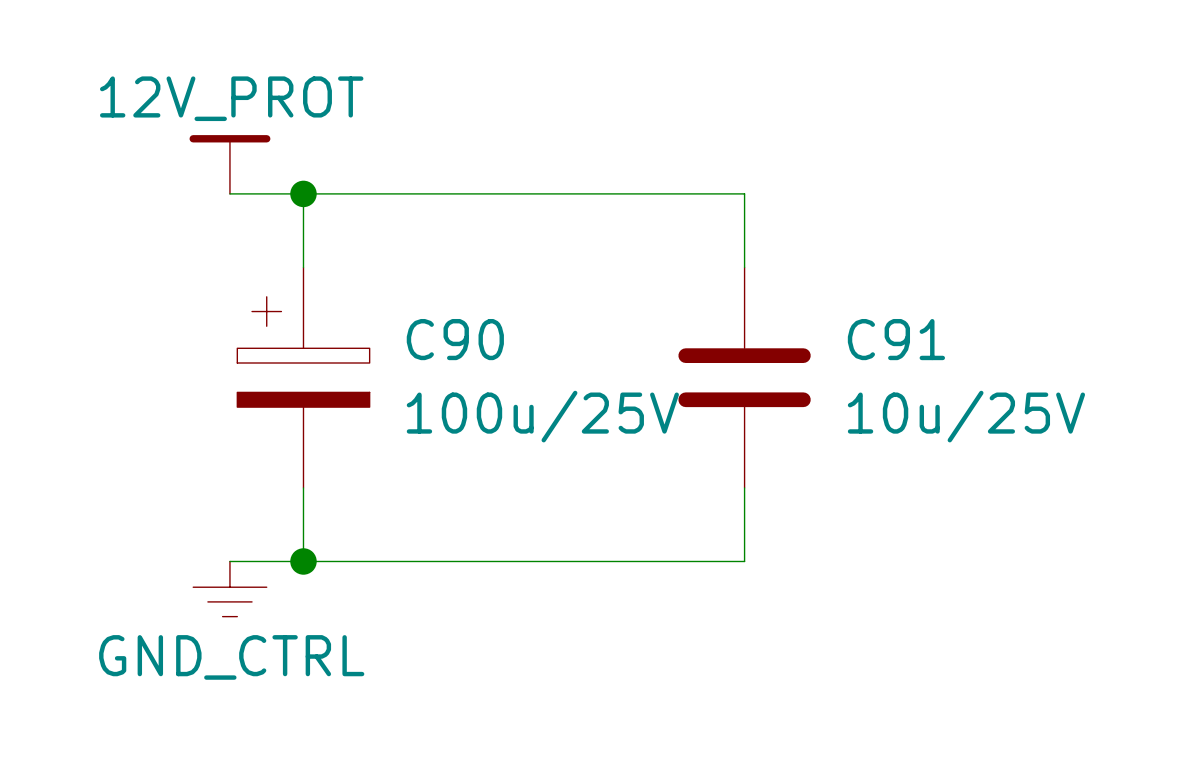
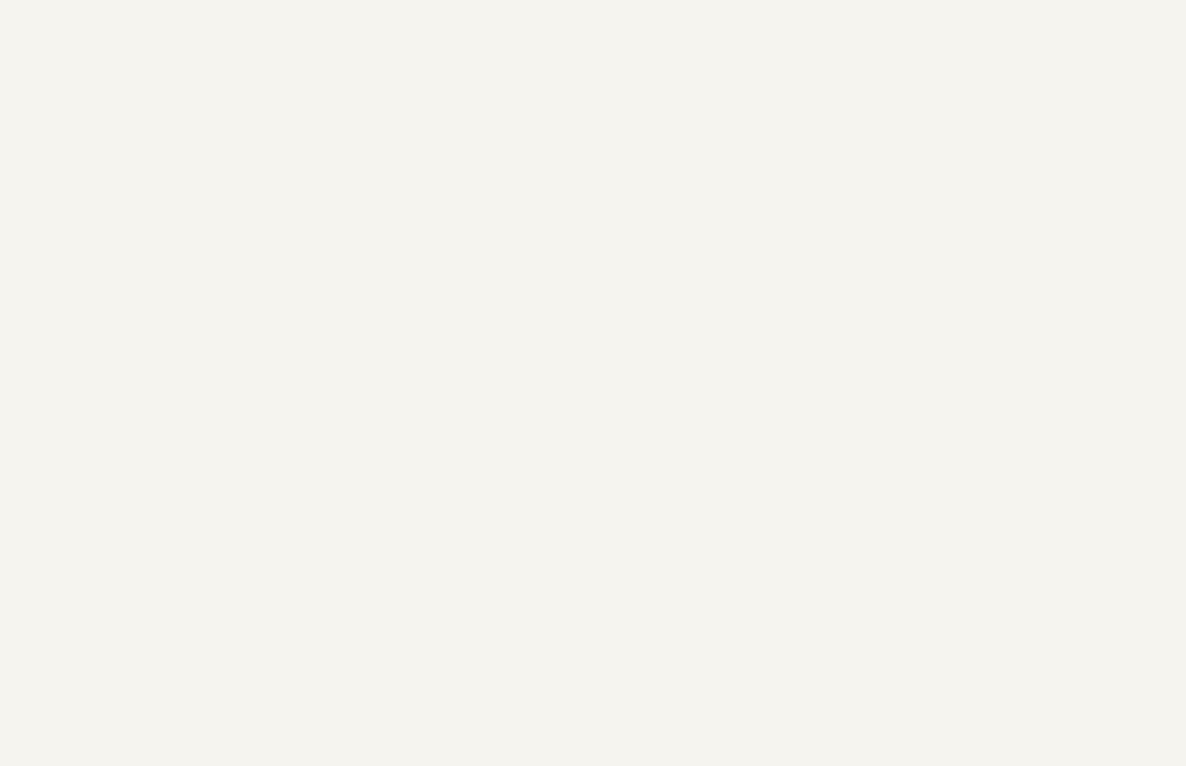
power symbol: 12V_PROT (229, 164) -> none
wire: (229, 193) (744, 193) (744, 267) -> none
wire: (303, 193) (303, 267) -> none
junction: (303, 193) -> none
C90: 100u/25V (303, 377) -> none
C91: 10u/25V (744, 377) -> none
wire: (303, 487) (303, 561) -> none
wire: (744, 487) (744, 561) (229, 561) -> none
junction: (303, 561) -> none
power symbol: GND_CTRL (229, 589) -> none

